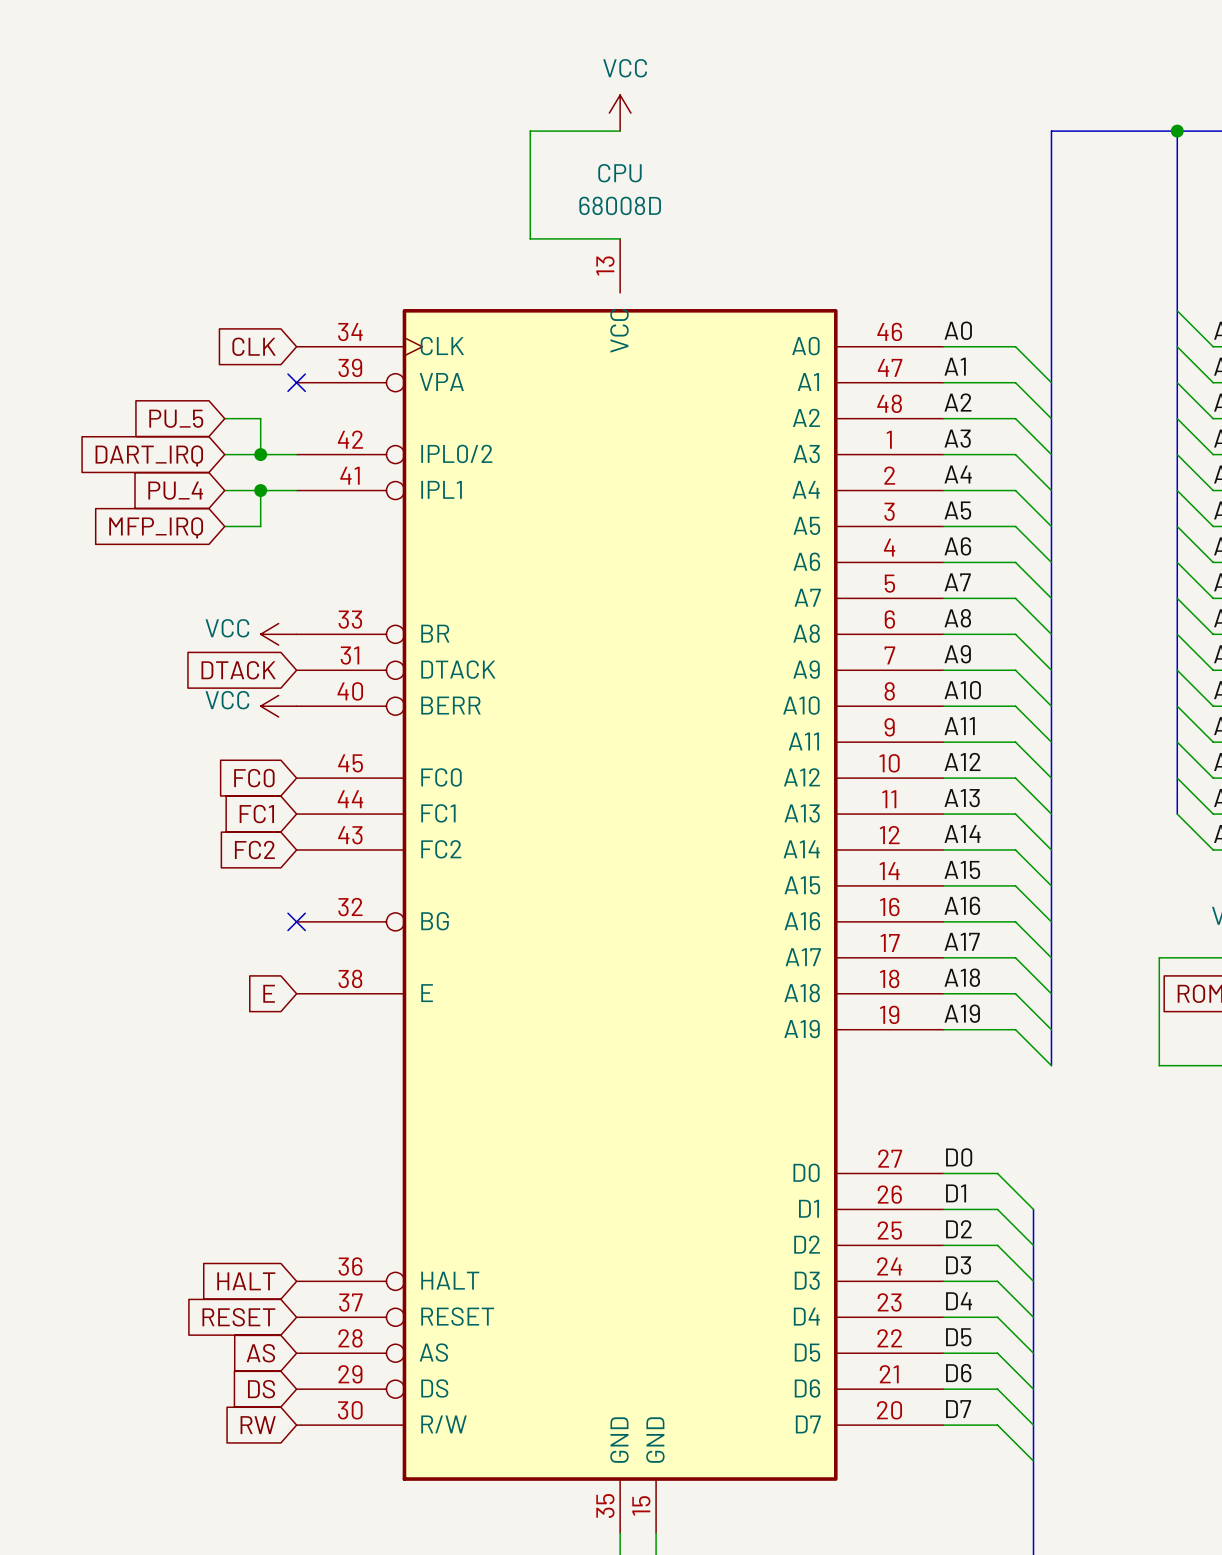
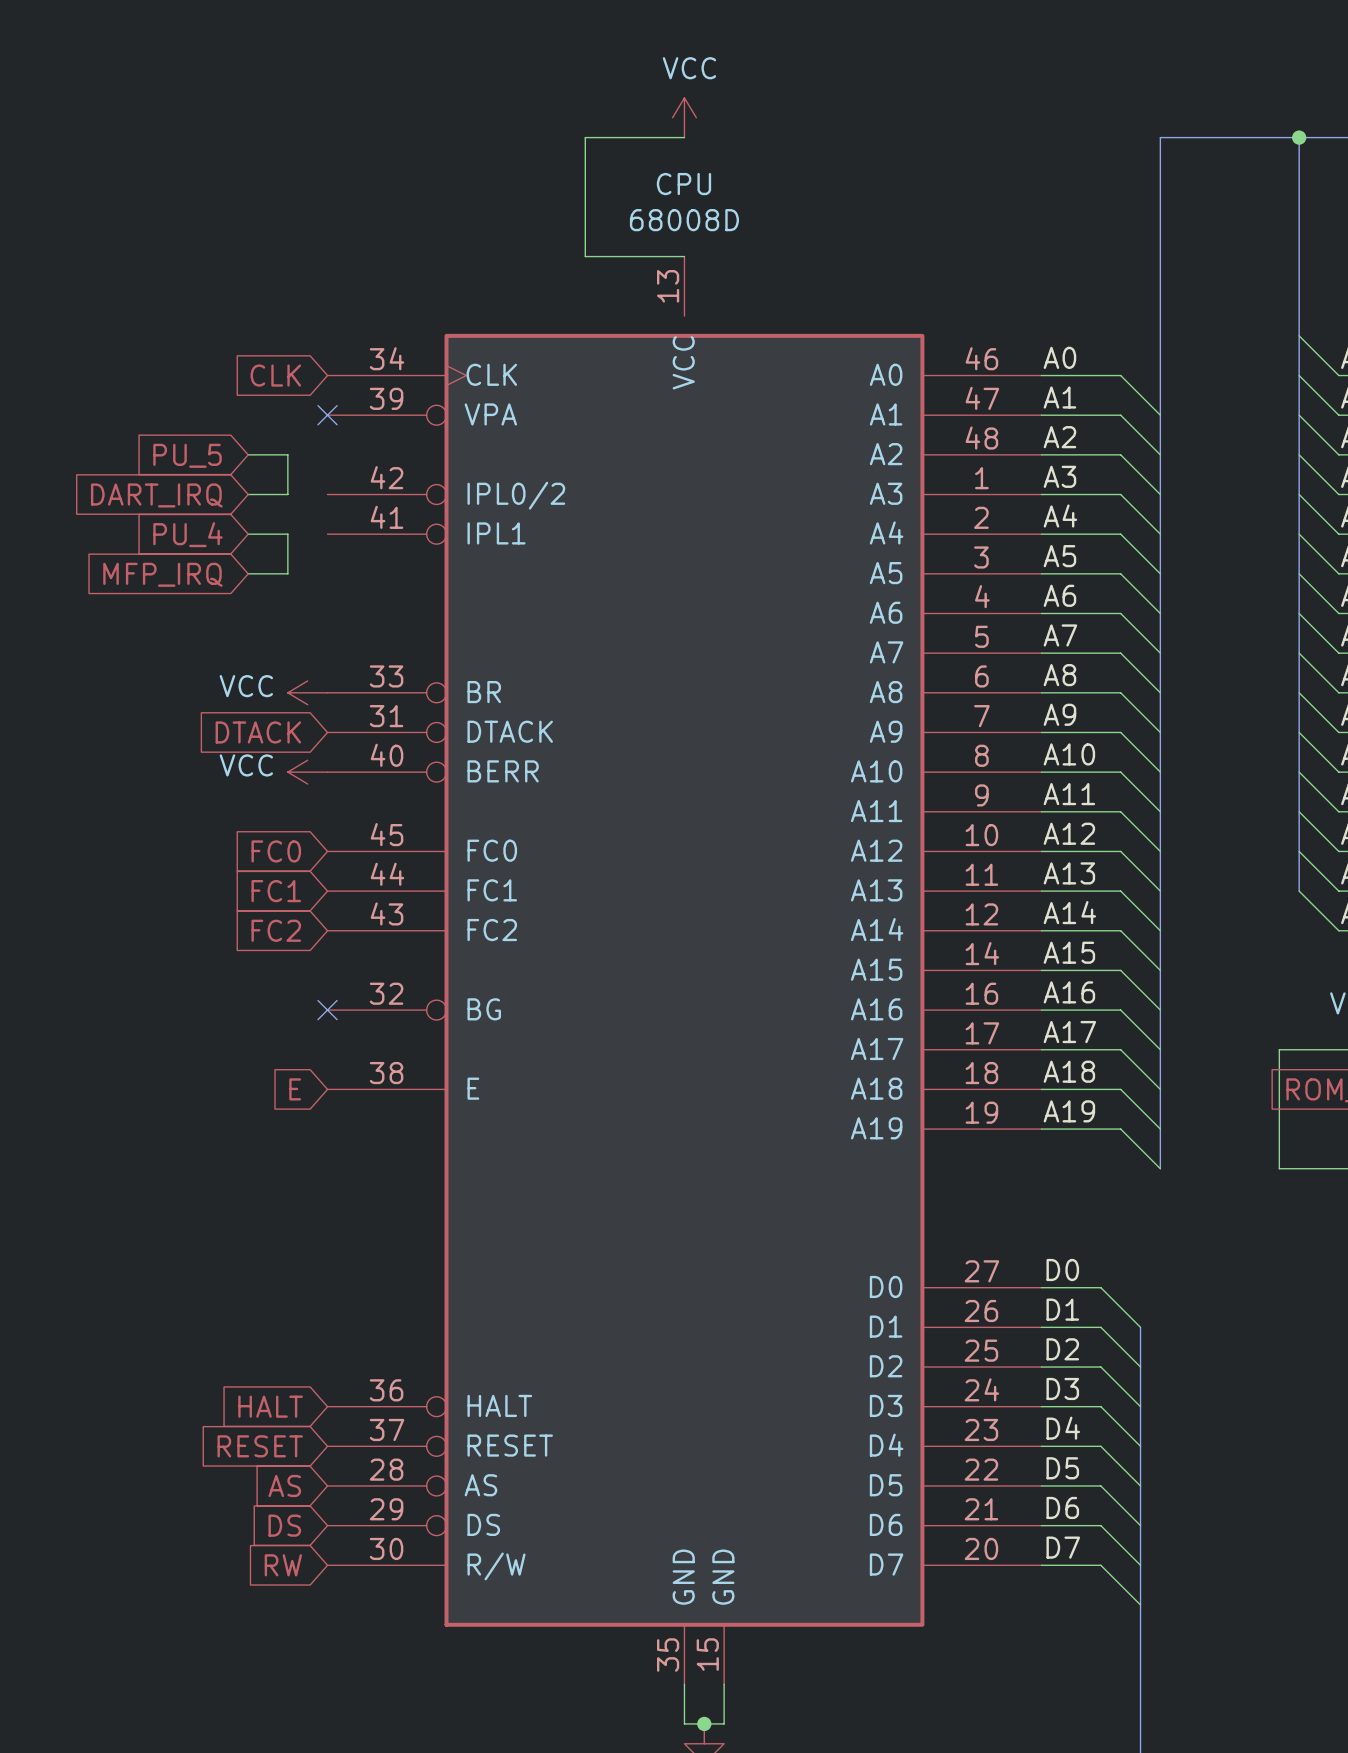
wire: (260, 454) (296, 454) -> none
junction: (260, 454) -> none
wire: (260, 490) (296, 490) -> none
junction: (260, 490) -> none

